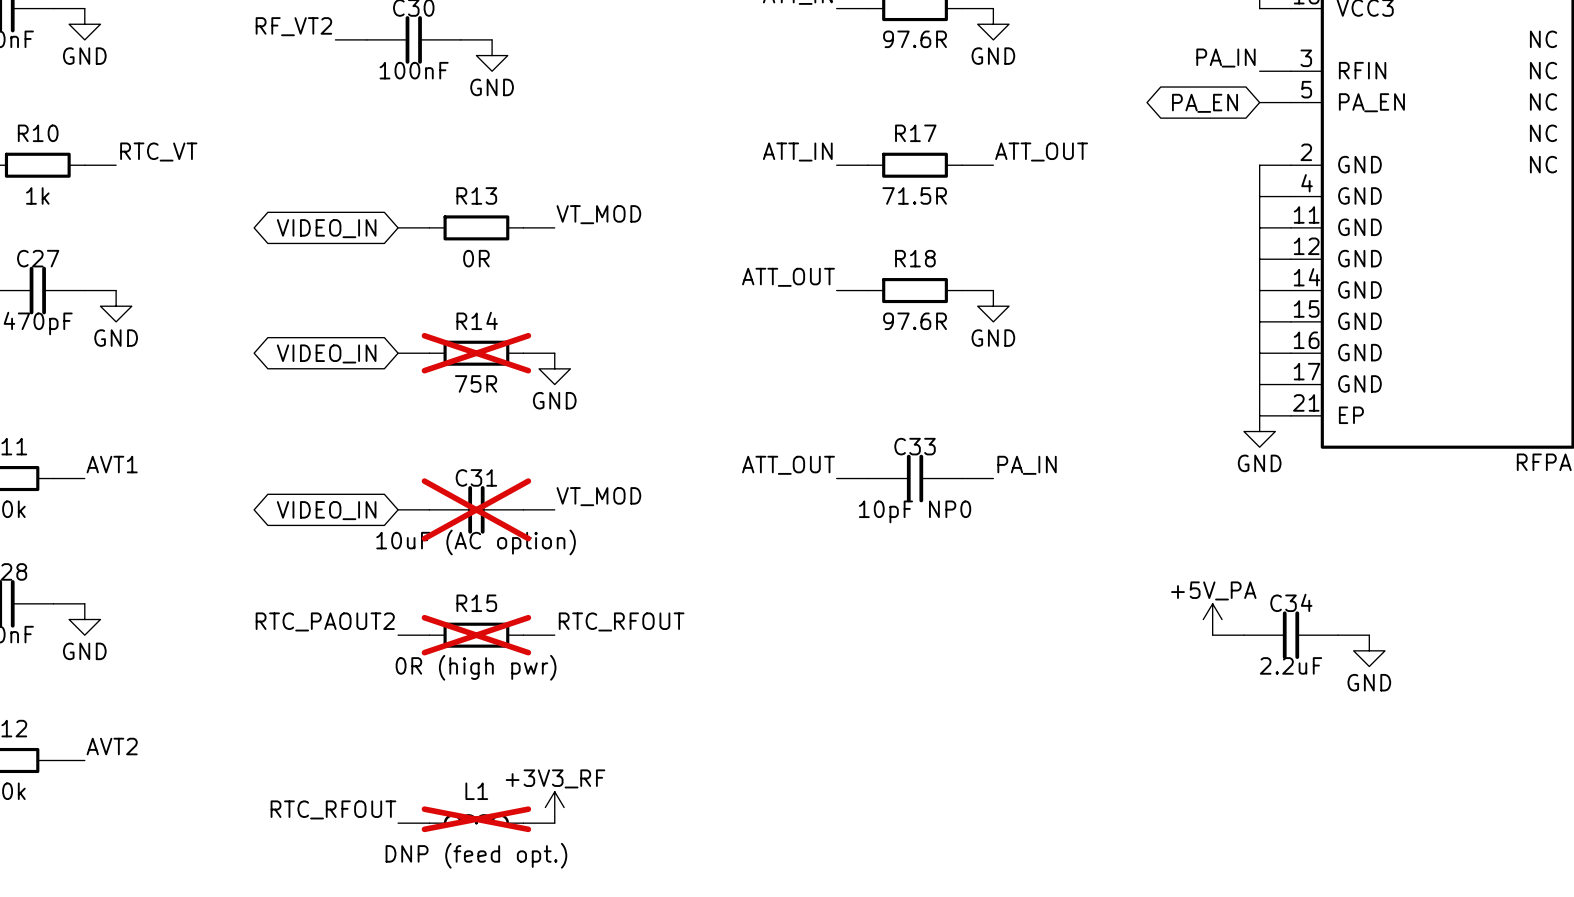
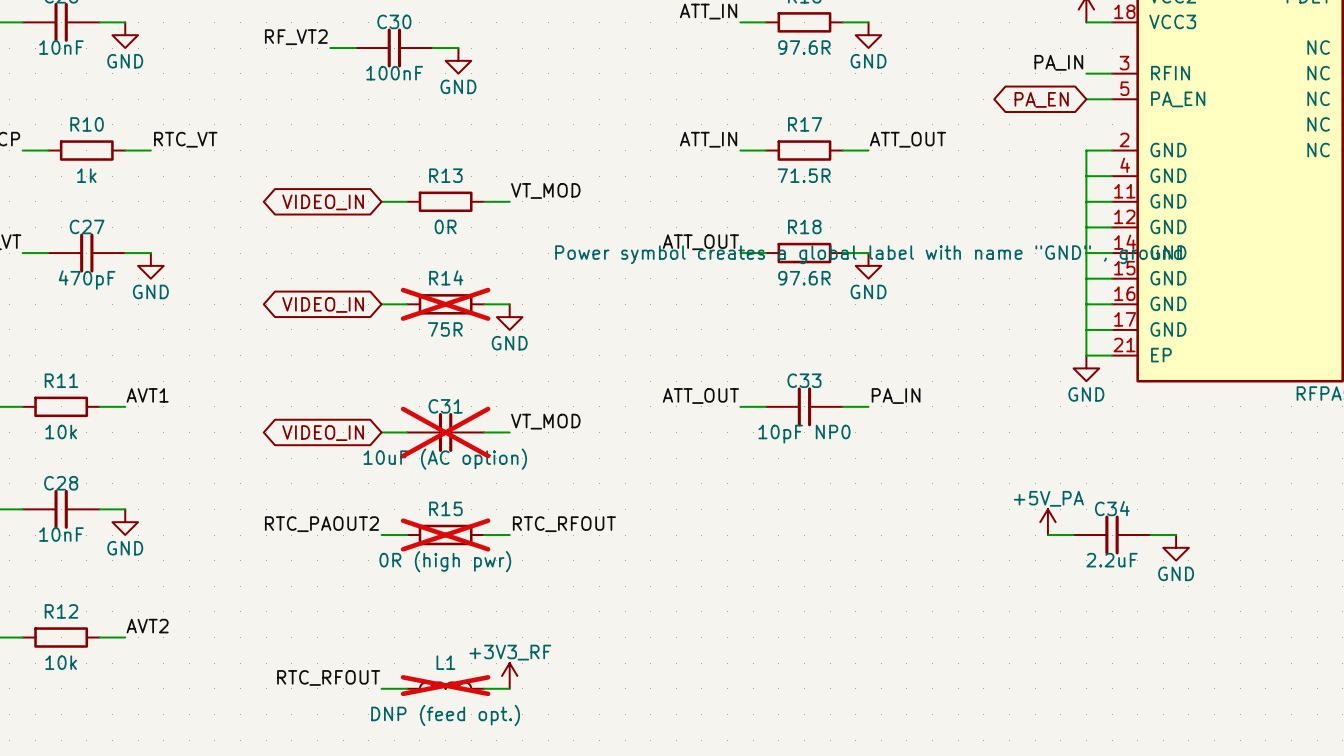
power symbol text: none -> Power symbol creates a global label with name "GND" , ground (868, 254)

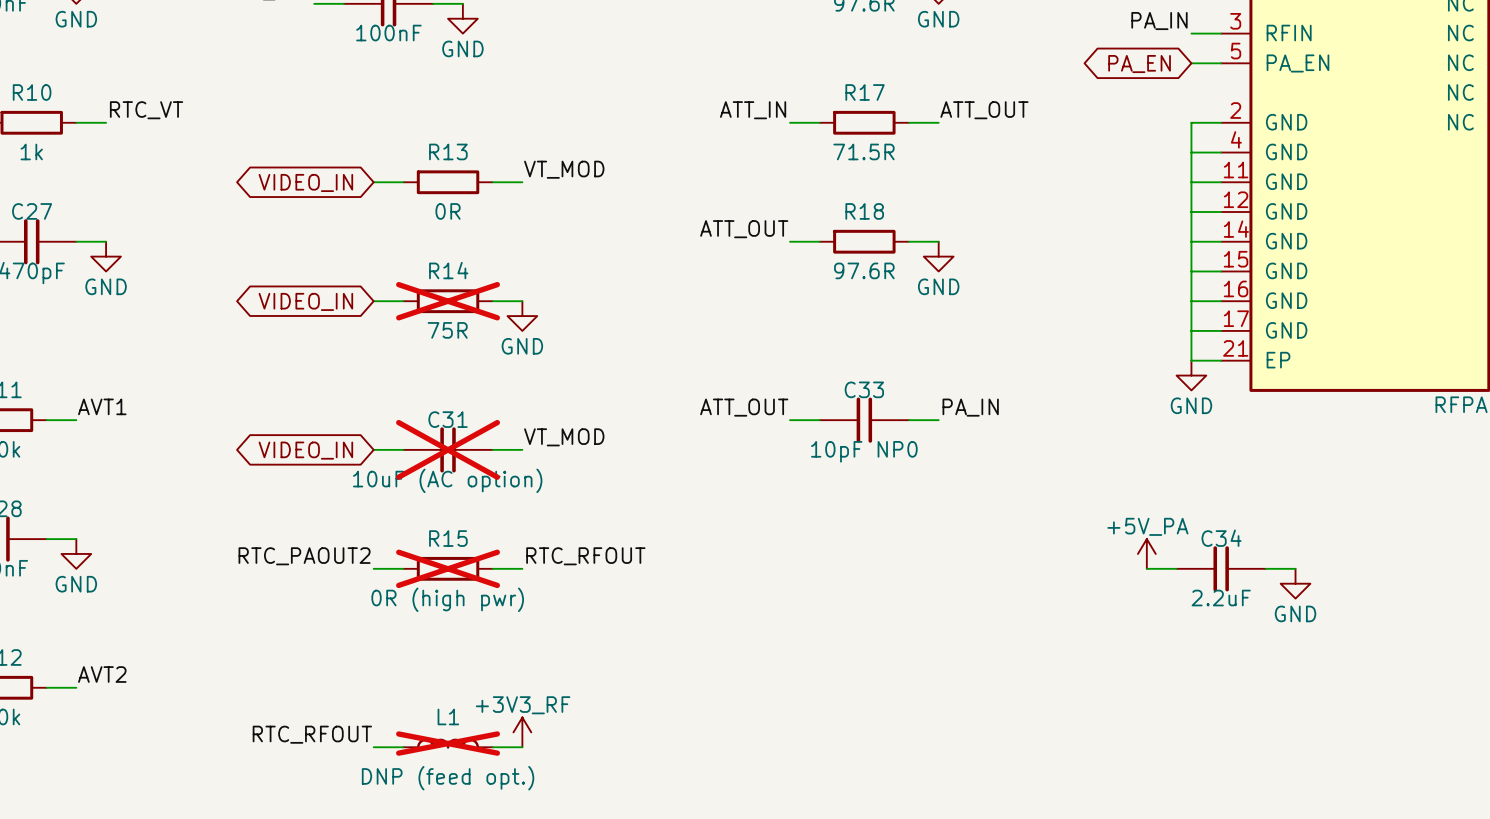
power symbol text: Power symbol creates a global label with name "GND" , ground (868, 254) -> none

